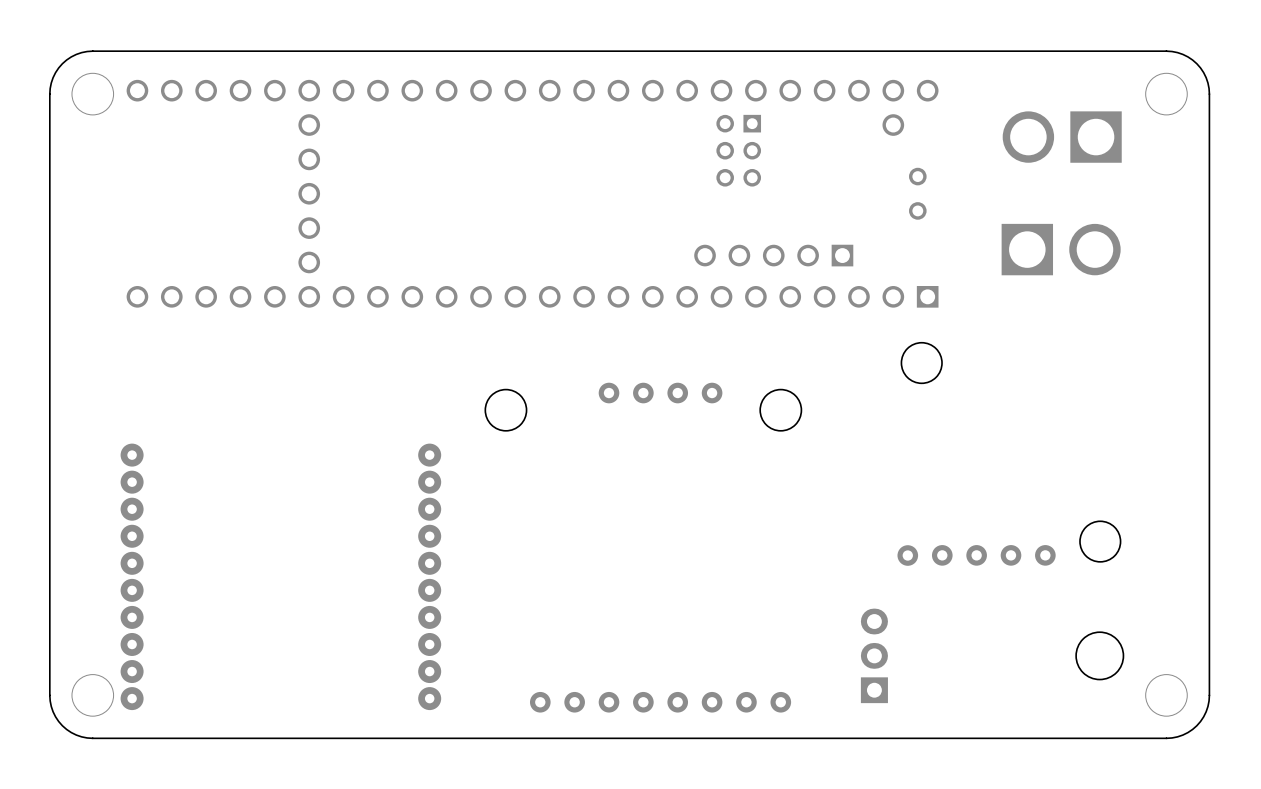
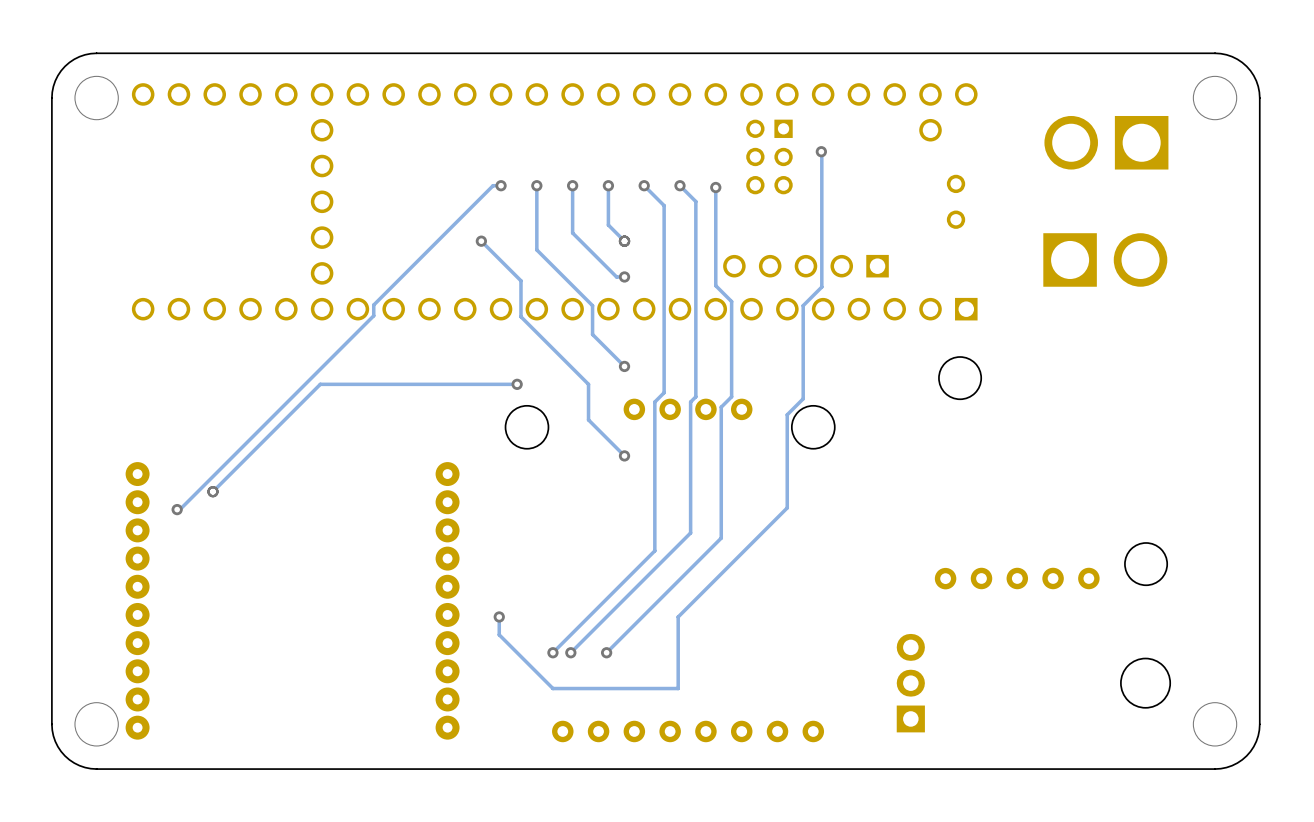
track: none -> (821, 151) (821, 287) (803, 305) (803, 398) (787, 414) (787, 507) (678, 616) (678, 688) (552, 688) (499, 634) (499, 616)
via: none -> (821, 151)
track: none -> (501, 185) (493, 185) (373, 305) (373, 315) (179, 509) (177, 509)
via: none -> (501, 185)
track: none -> (536, 185) (536, 249) (592, 305) (592, 334) (624, 366)
via: none -> (536, 185)
track: none -> (572, 185) (572, 233) (616, 276) (624, 276)
via: none -> (572, 185)
track: none -> (608, 185) (608, 225) (624, 241)
via: none -> (608, 185)
track: none -> (644, 185) (664, 205) (664, 392) (654, 402) (654, 550) (552, 652)
via: none -> (644, 185)
track: none -> (679, 185) (695, 201) (695, 396) (690, 402) (690, 532) (570, 652)
via: none -> (679, 185)
track: none -> (715, 187) (715, 285) (731, 301) (731, 396) (721, 407) (721, 538) (606, 652)
via: none -> (715, 187)
track: none -> (481, 241) (520, 280) (520, 316) (588, 384) (588, 419) (624, 455)
via: none -> (481, 241)
via: none -> (624, 241)
via: none -> (624, 276)
via: none -> (624, 366)
track: none -> (517, 384) (320, 384) (212, 491)
via: none -> (517, 384)
via: none -> (624, 455)
via: none -> (212, 491)
via: none -> (177, 509)
via: none -> (499, 616)
via: none -> (552, 652)
via: none -> (570, 652)
via: none -> (606, 652)

